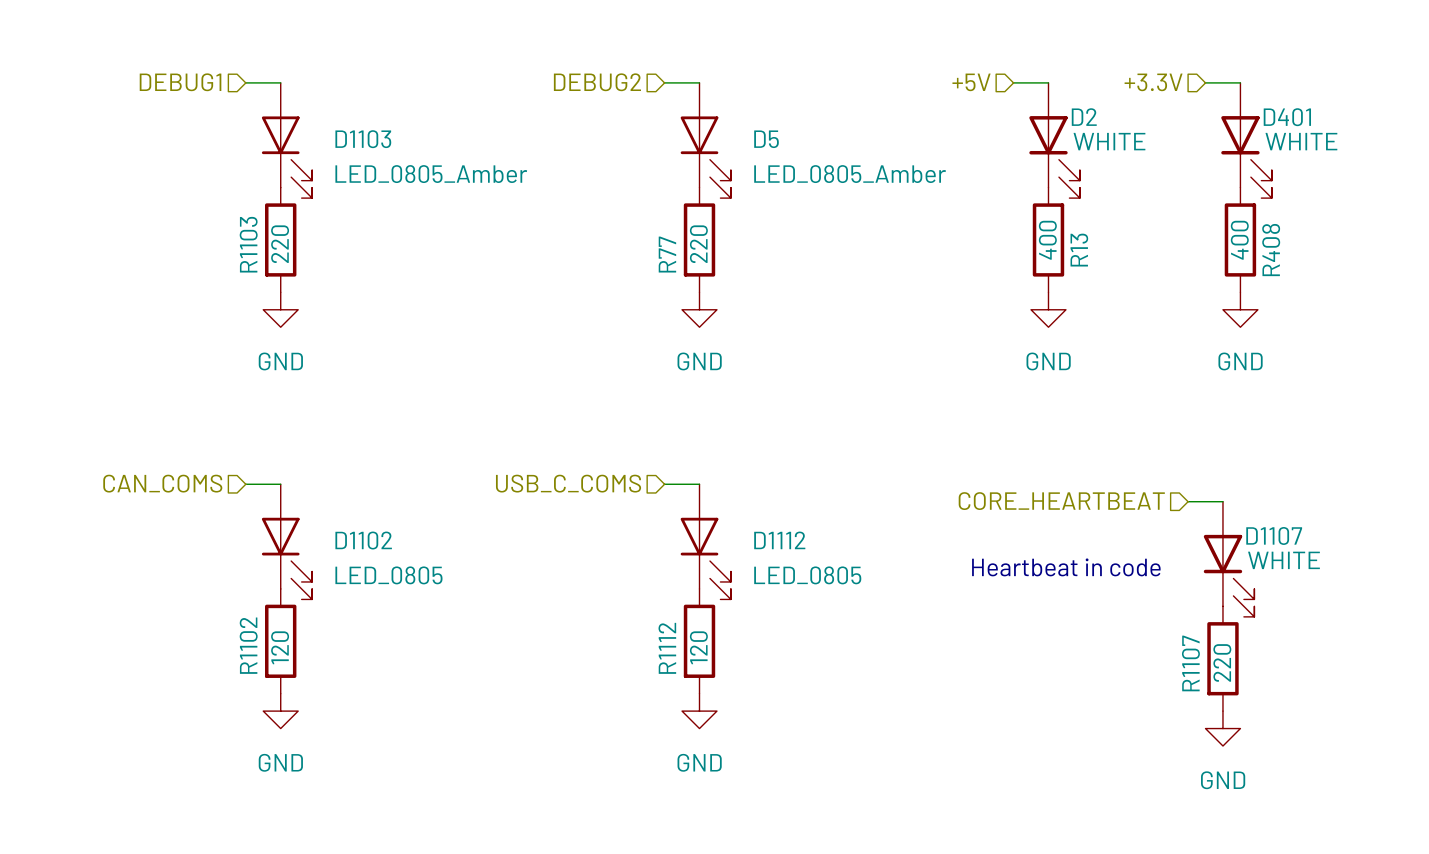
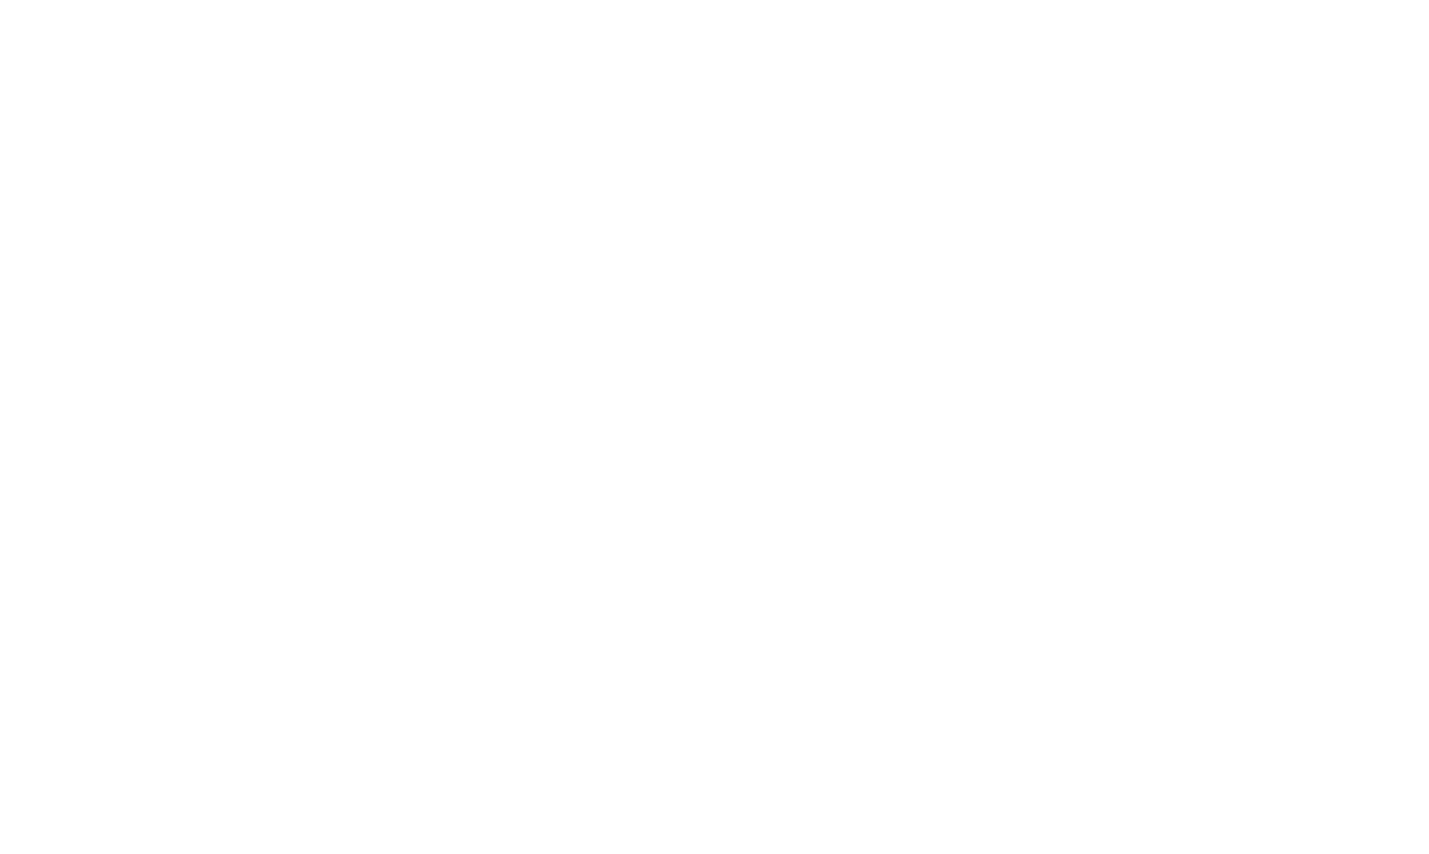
hierarchical label: DEBUG1 (180, 82) -> none
wire: (245, 82) (280, 82) -> none
hierarchical label: DEBUG2 (597, 82) -> none
wire: (664, 82) (699, 82) -> none
hierarchical label: +5V (971, 82) -> none
wire: (1013, 82) (1048, 82) -> none
hierarchical label: +3.3V (1153, 82) -> none
wire: (1205, 82) (1240, 82) -> none
D1103: LED_0805_Amber (287, 140) -> none
D5: LED_0805_Amber (705, 140) -> none
D2: WHITE (1054, 140) -> none
D401: WHITE (1246, 140) -> none
R1103: 220 (280, 239) -> none
R77: 220 (699, 239) -> none
R13: 400 (1048, 239) -> none
R408: 400 (1240, 239) -> none
power symbol: GND (280, 309) -> none
power symbol: GND (699, 309) -> none
power symbol: GND (1048, 309) -> none
power symbol: GND (1240, 309) -> none
hierarchical label: CAN_COMS (162, 483) -> none
hierarchical label: USB_C_COMS (568, 483) -> none
wire: (245, 484) (280, 484) -> none
wire: (664, 484) (699, 484) -> none
hierarchical label: CORE_HEARTBEAT (1061, 501) -> none
wire: (1188, 501) (1222, 501) -> none
D1102: LED_0805 (287, 541) -> none
D1112: LED_0805 (705, 541) -> none
D1107: WHITE (1229, 559) -> none
text: Heartbeat in code (1066, 567) -> none
R1102: 120 (280, 641) -> none
R1112: 120 (699, 641) -> none
R1107: 220 (1222, 658) -> none
power symbol: GND (280, 711) -> none
power symbol: GND (699, 711) -> none
power symbol: GND (1222, 728) -> none

